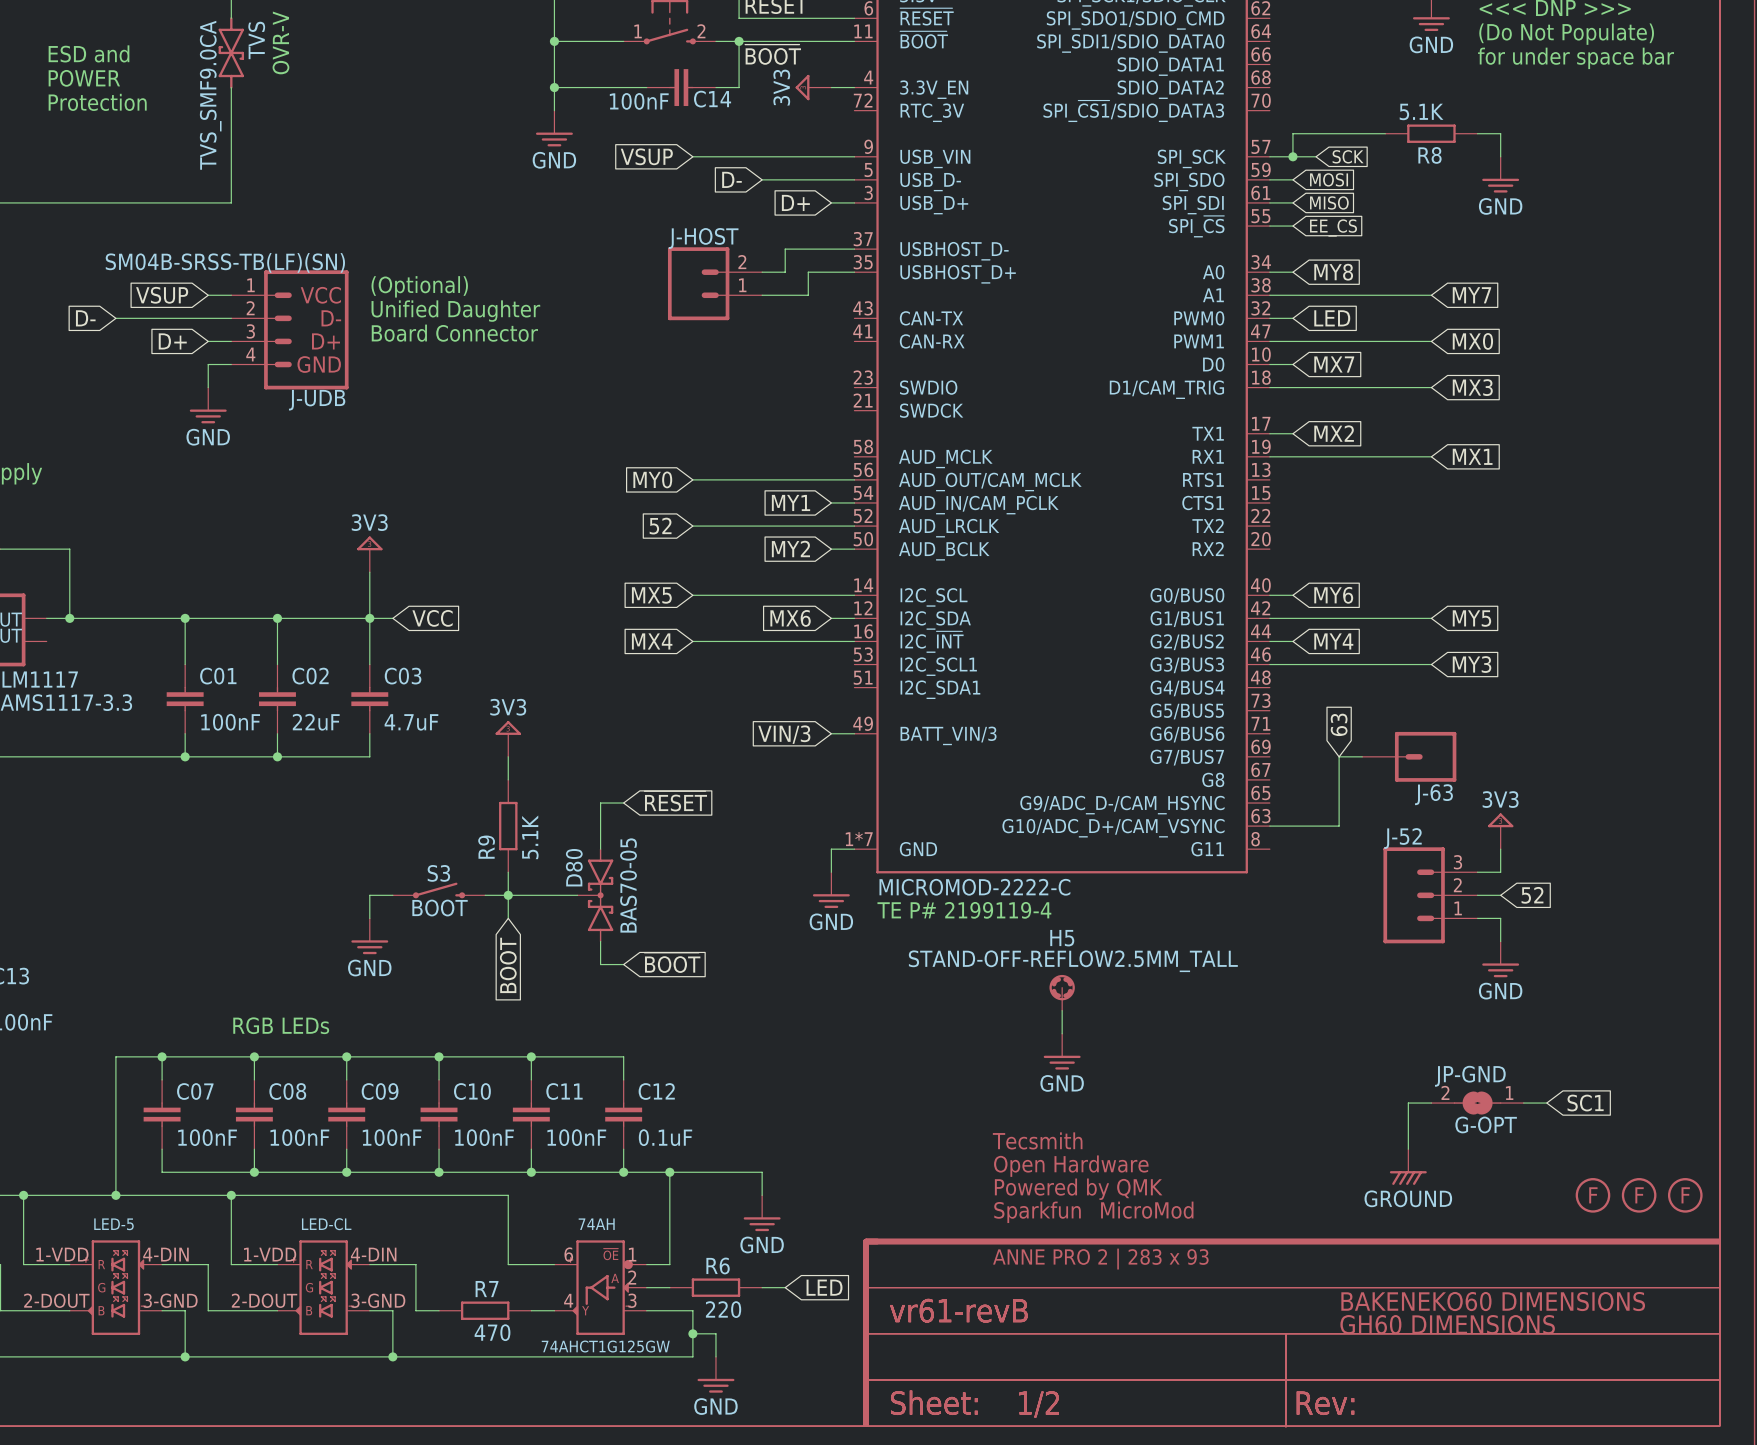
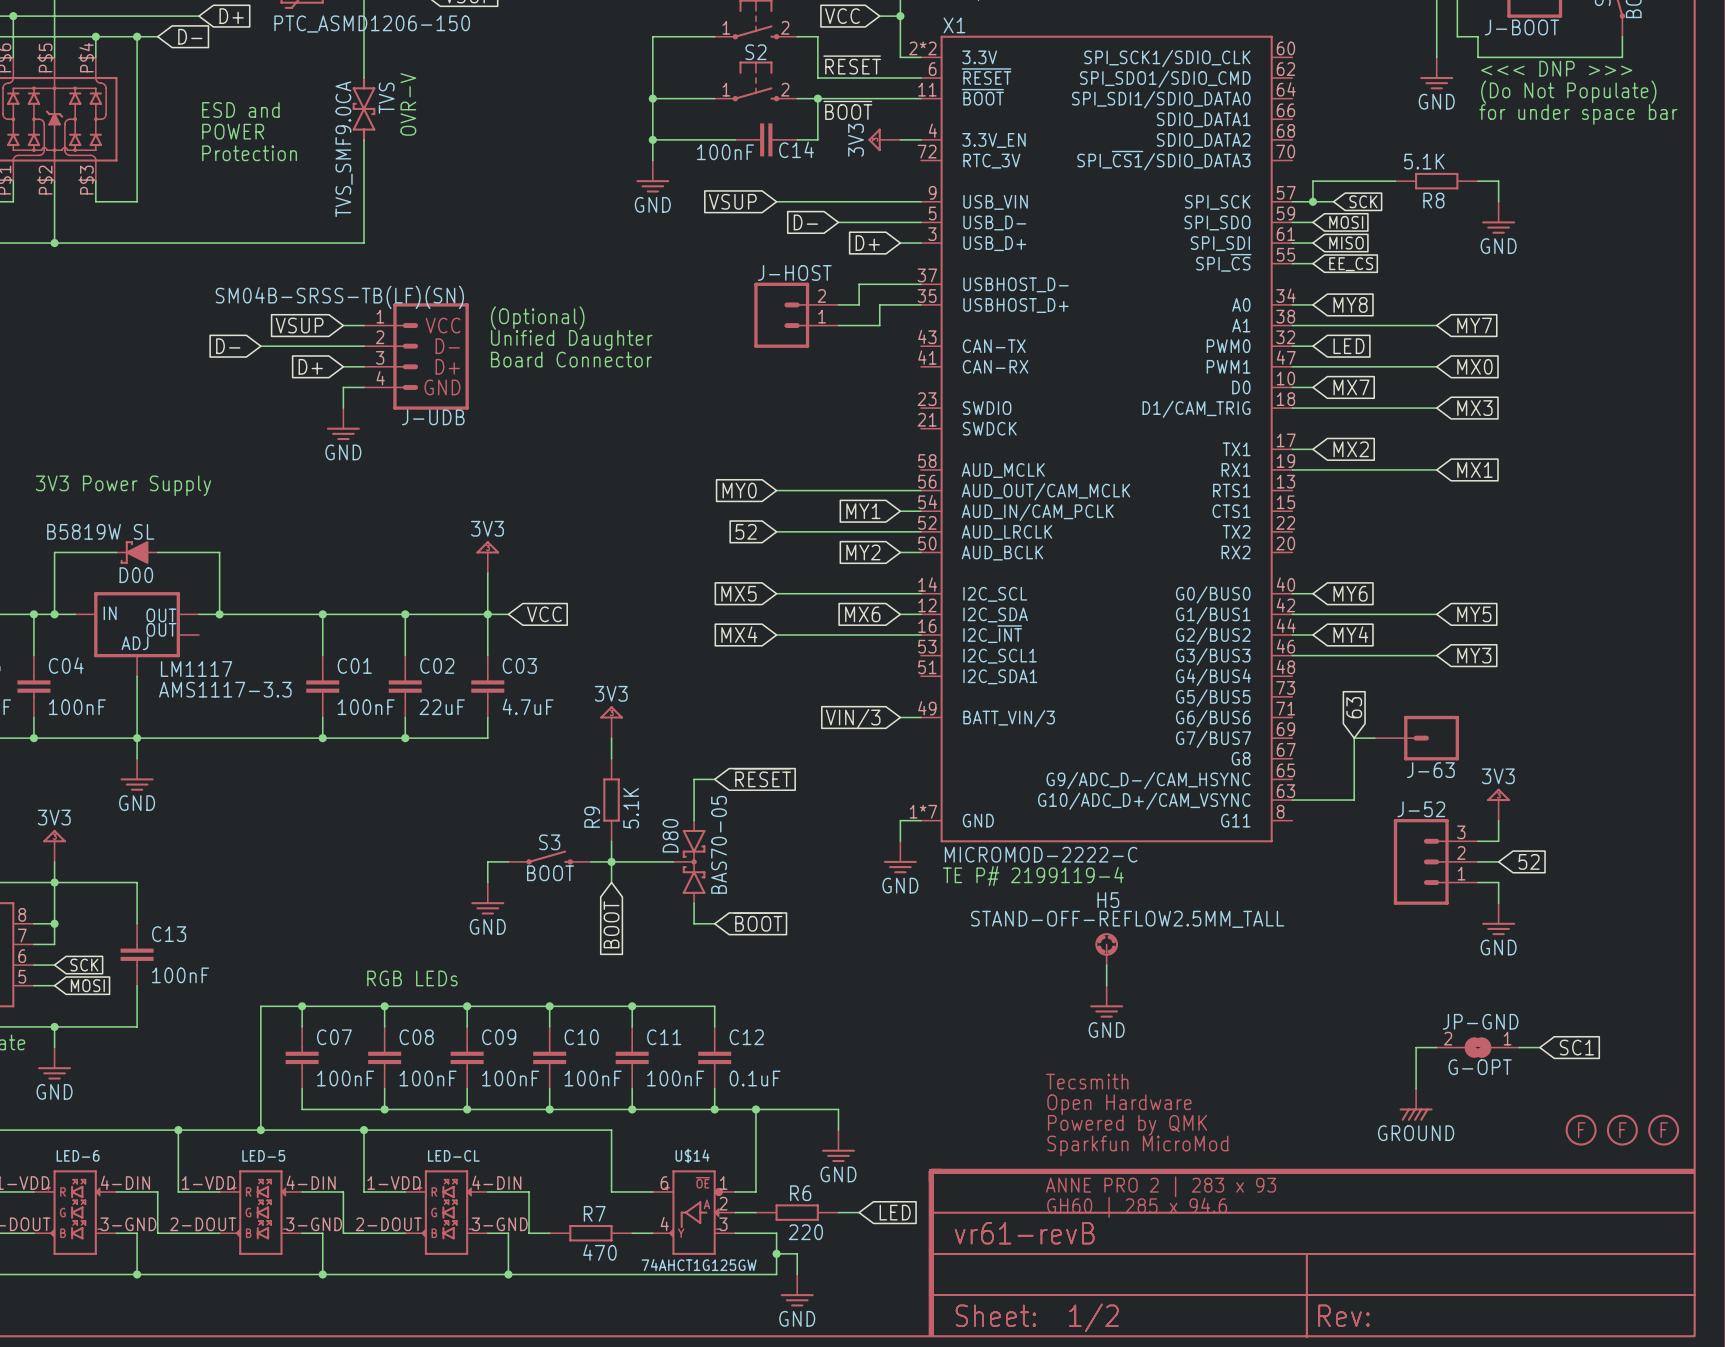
74AH name: 74AH (596, 1224) -> U$14 (692, 1155)
part: none -> (1137, 1207)
part: (1493, 1301) -> none
part: (1447, 1324) -> none

